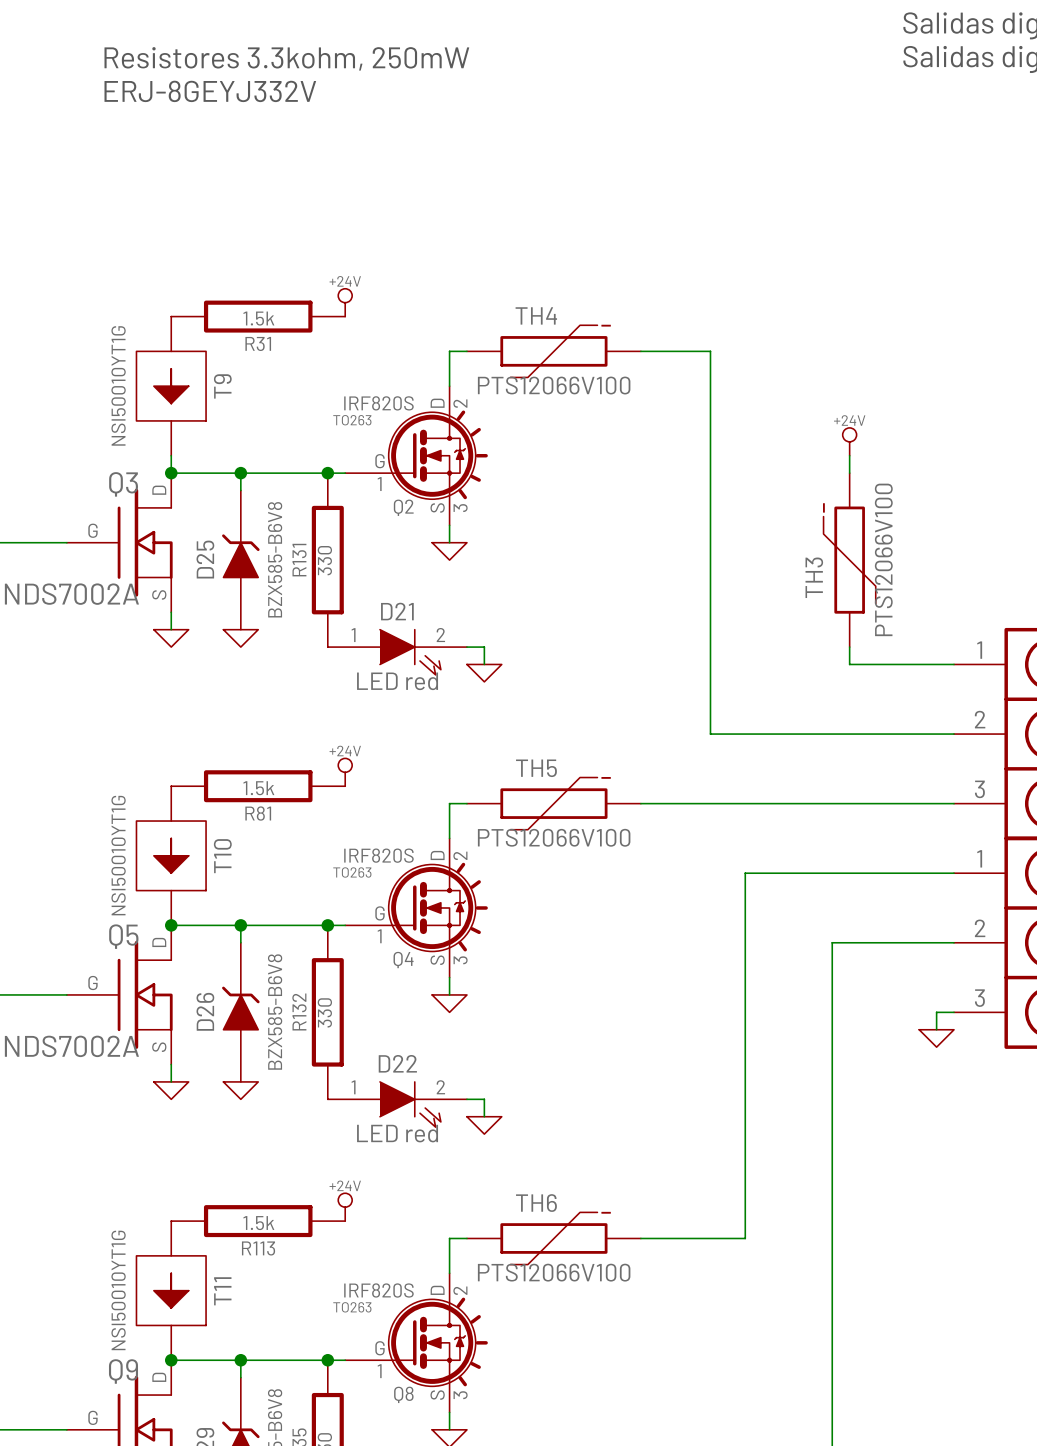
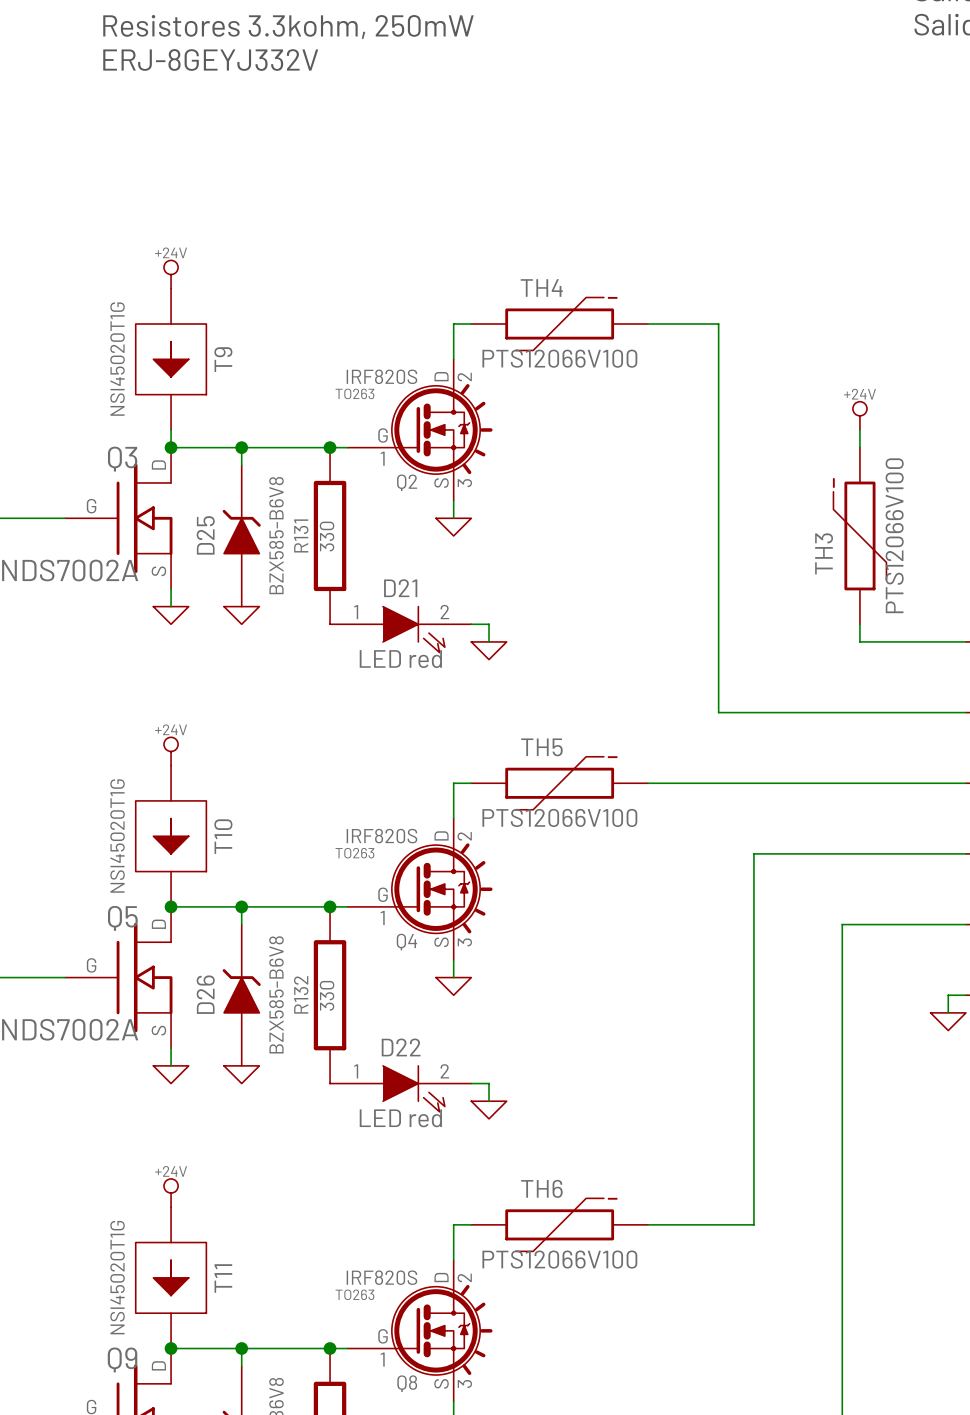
power symbol position: +24V (345, 302) -> +24V (171, 274)
R31: 1.5k (258, 316) -> none
T9 value: NSI50010YT1G (118, 385) -> NSI45020T1G (117, 359)
power symbol position: +24V (345, 772) -> +24V (171, 751)
R81: 1.5k (258, 786) -> none
T10 value: NSI50010YT1G (118, 855) -> NSI45020T1G (117, 836)
power symbol position: +24V (345, 1207) -> +24V (171, 1193)
R113: 1.5k (258, 1221) -> none
T11 value: NSI50010YT1G (118, 1290) -> NSI45020T1G (117, 1277)

